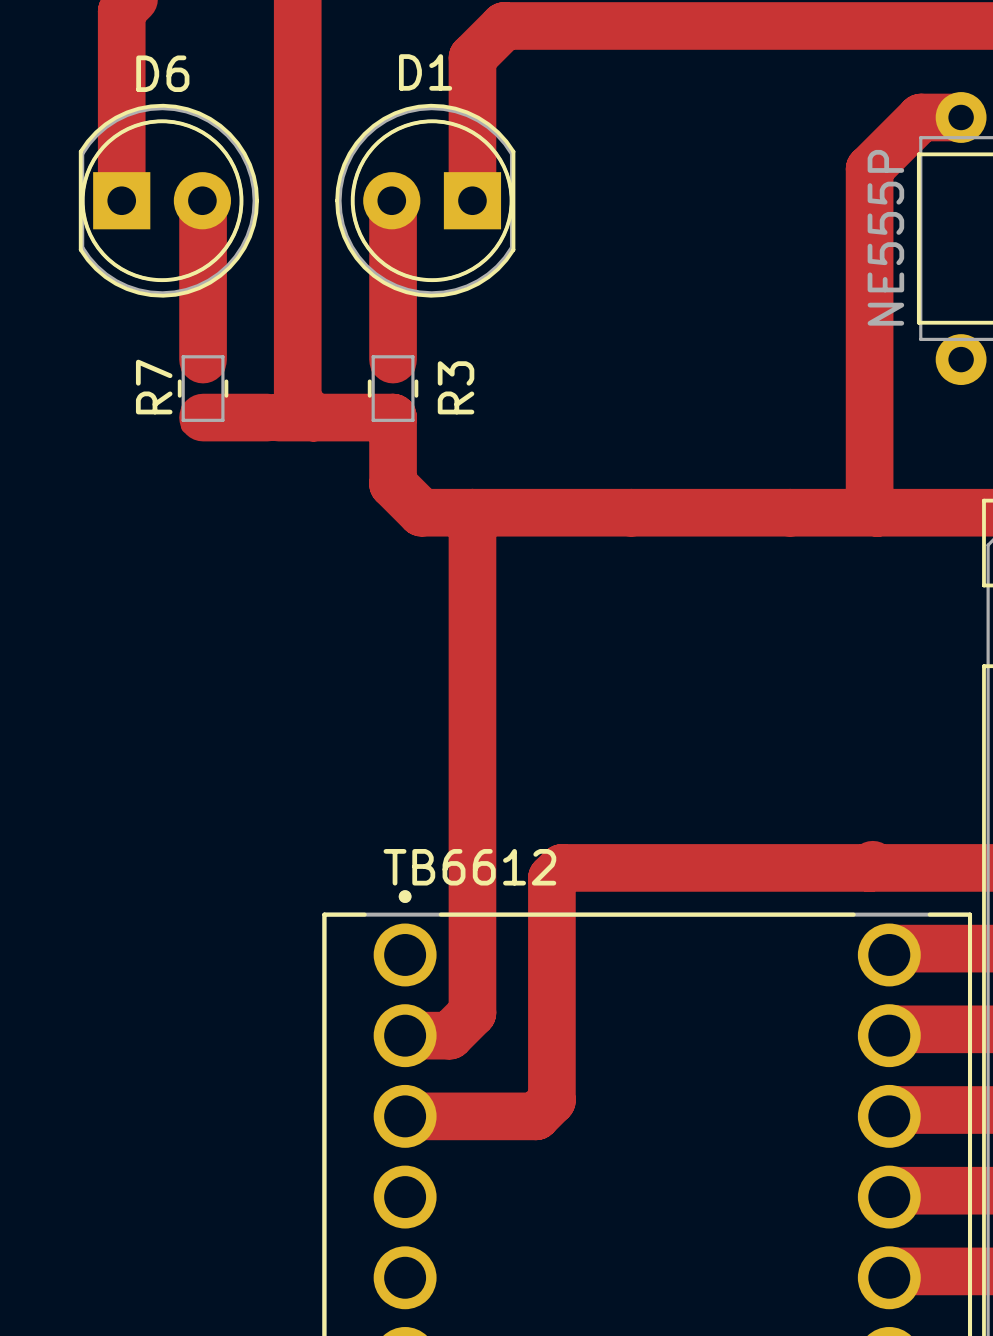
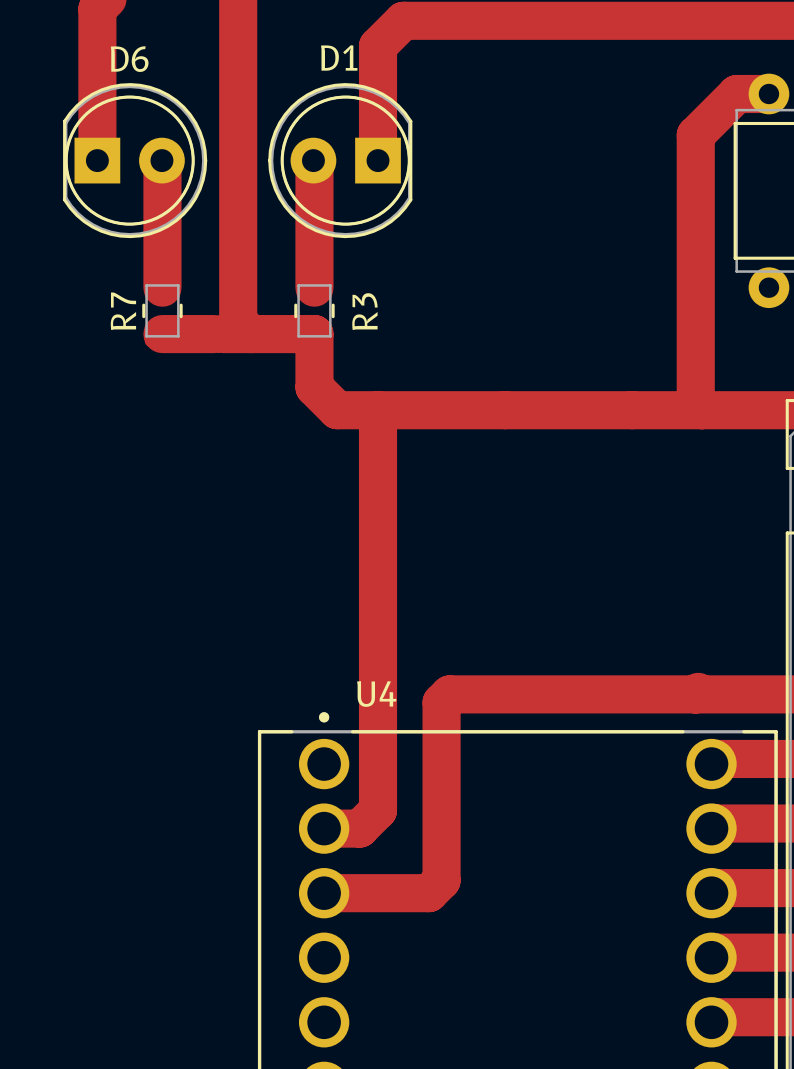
part value: NE555P (885, 237) -> none
TB6612 name: TB6612 (469, 867) -> U4 (376, 694)

